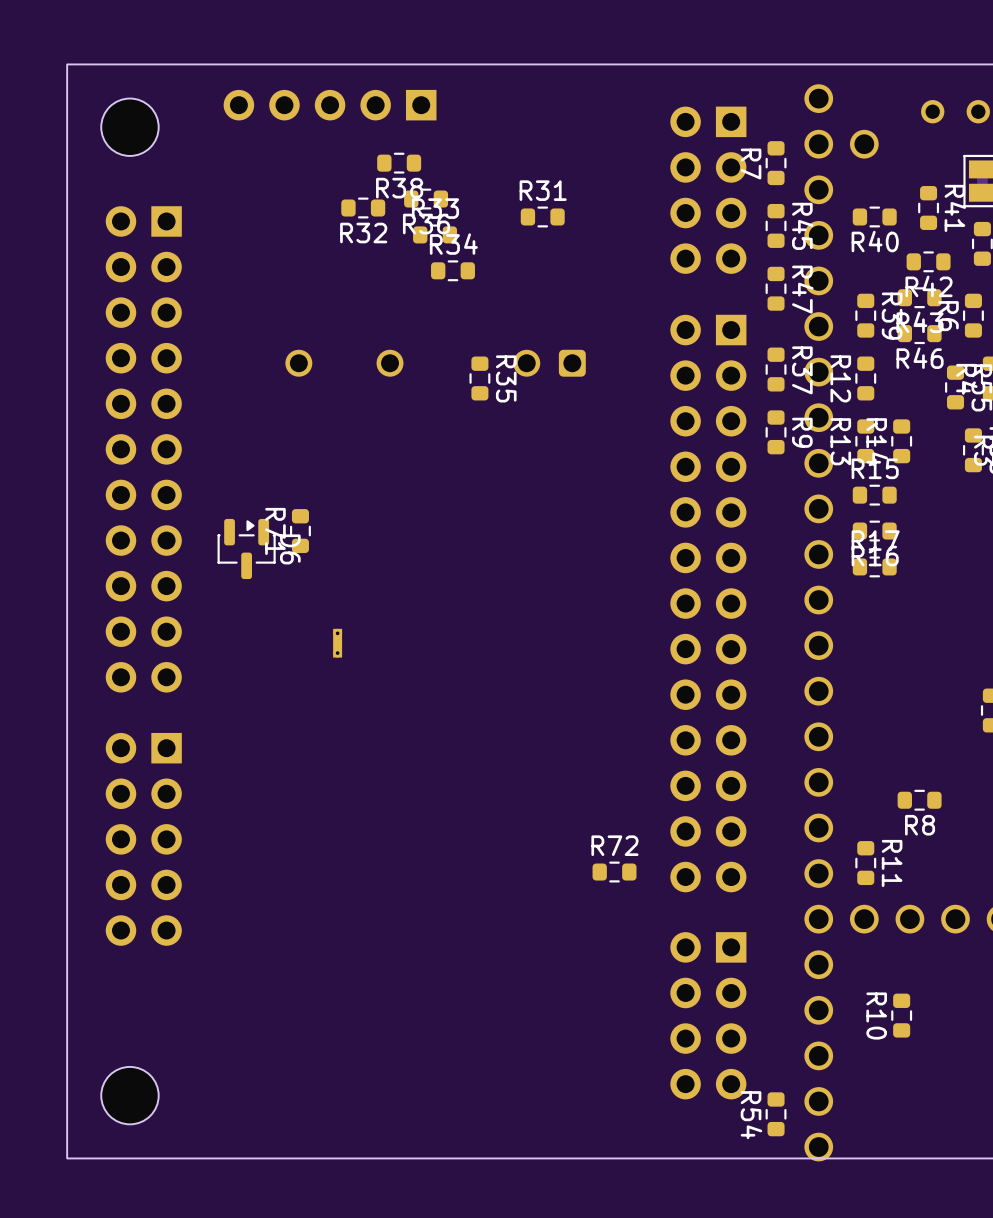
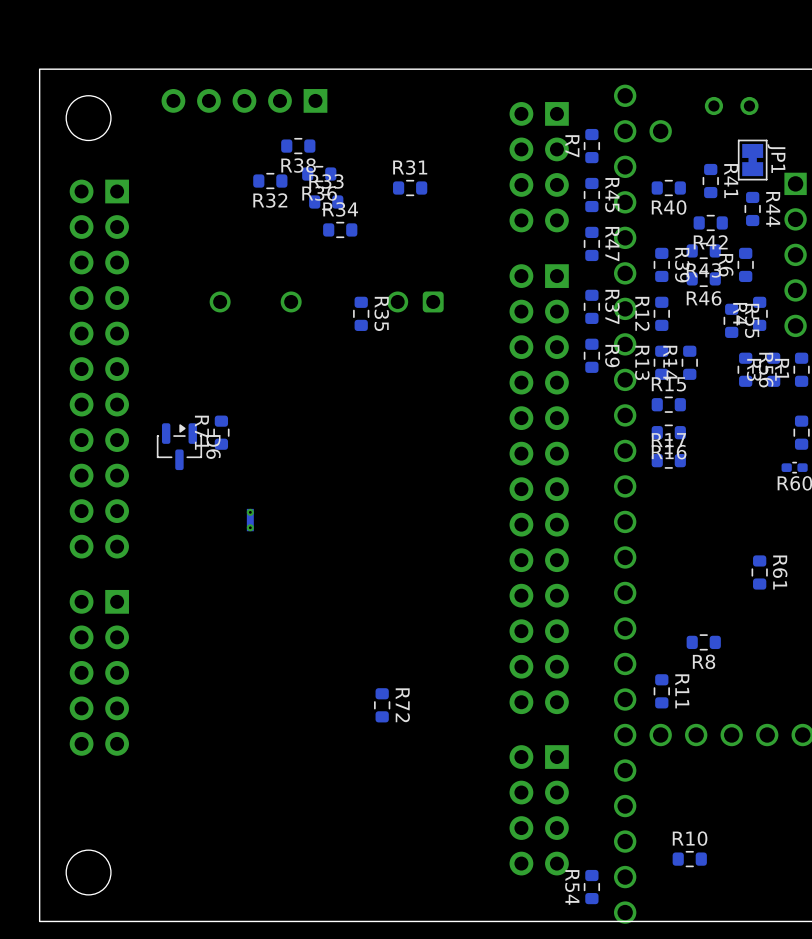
R72 rotation: 0° (614, 872) -> 90° clockwise (382, 705)
R72 position: (614, 872) -> (382, 705)
R10 rotation: 0° (901, 1015) -> 90° clockwise (689, 859)
R10 position: (901, 1015) -> (689, 859)

